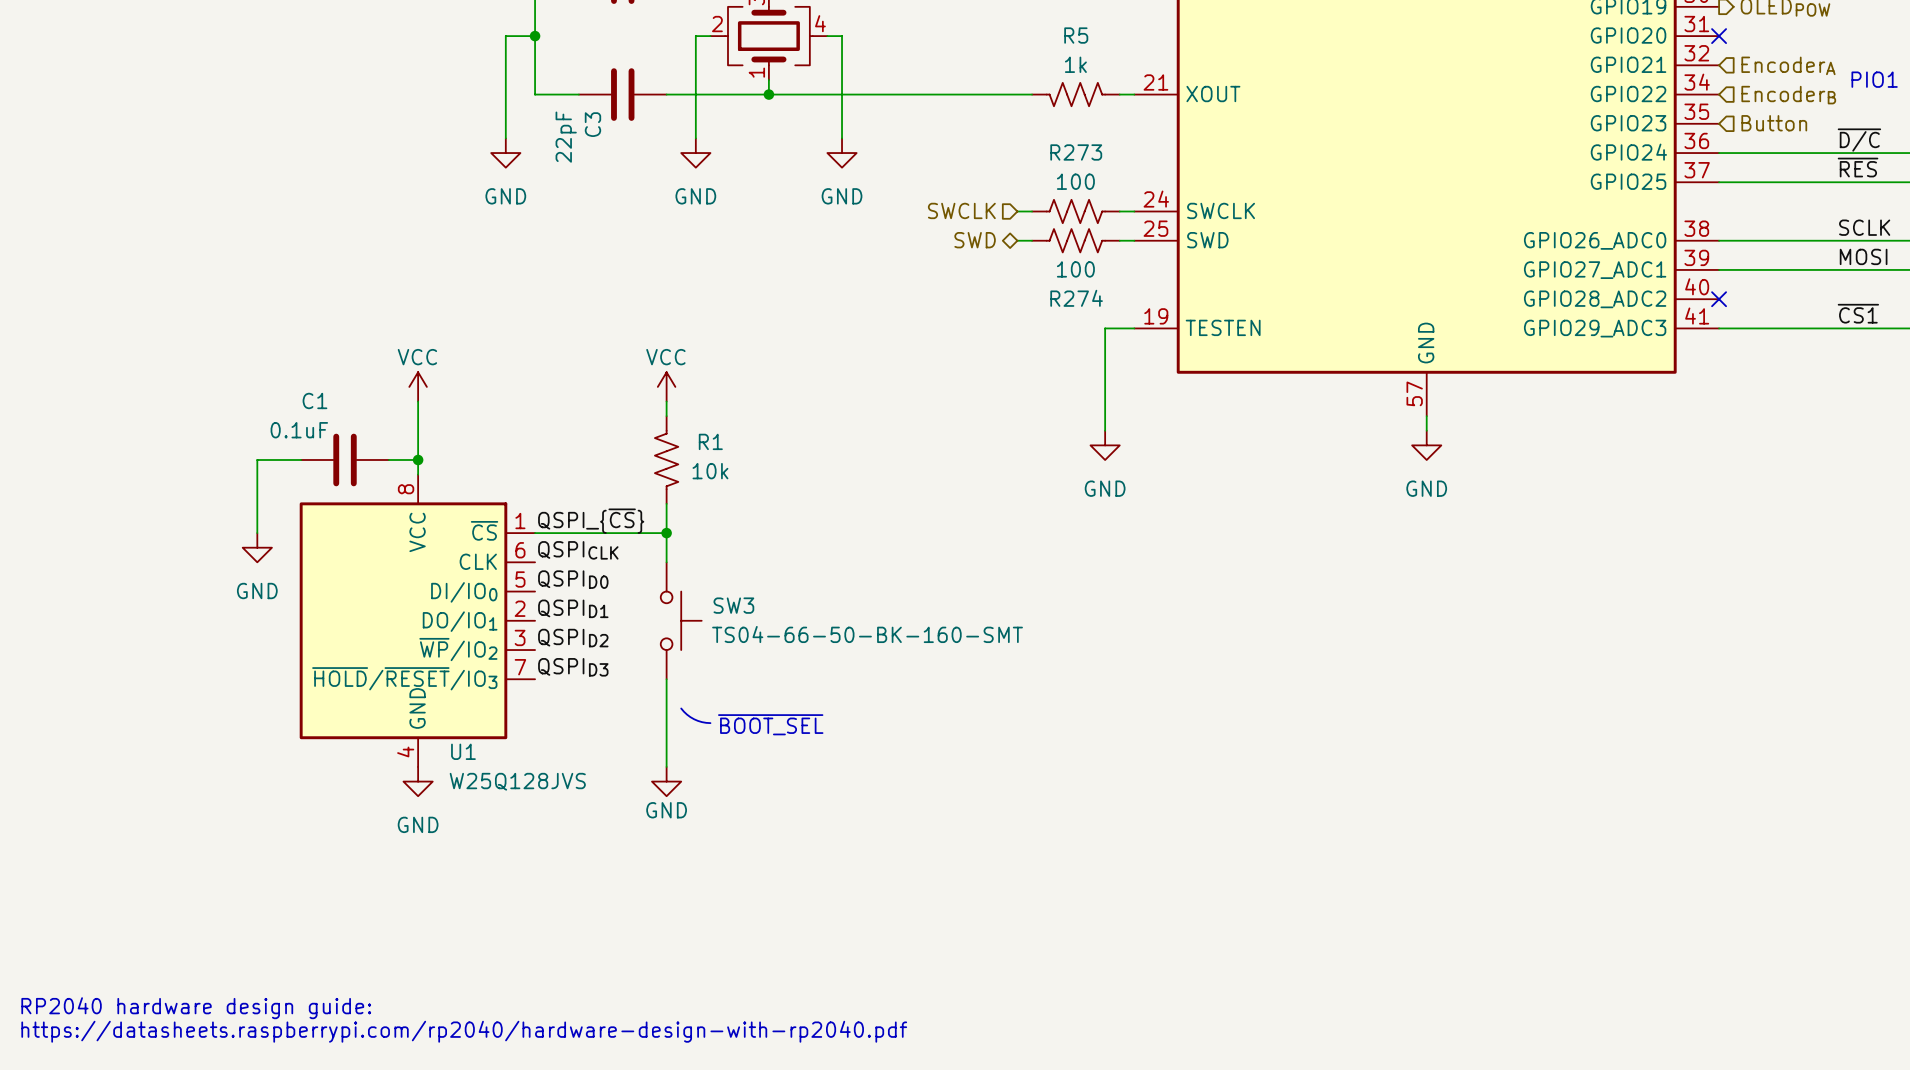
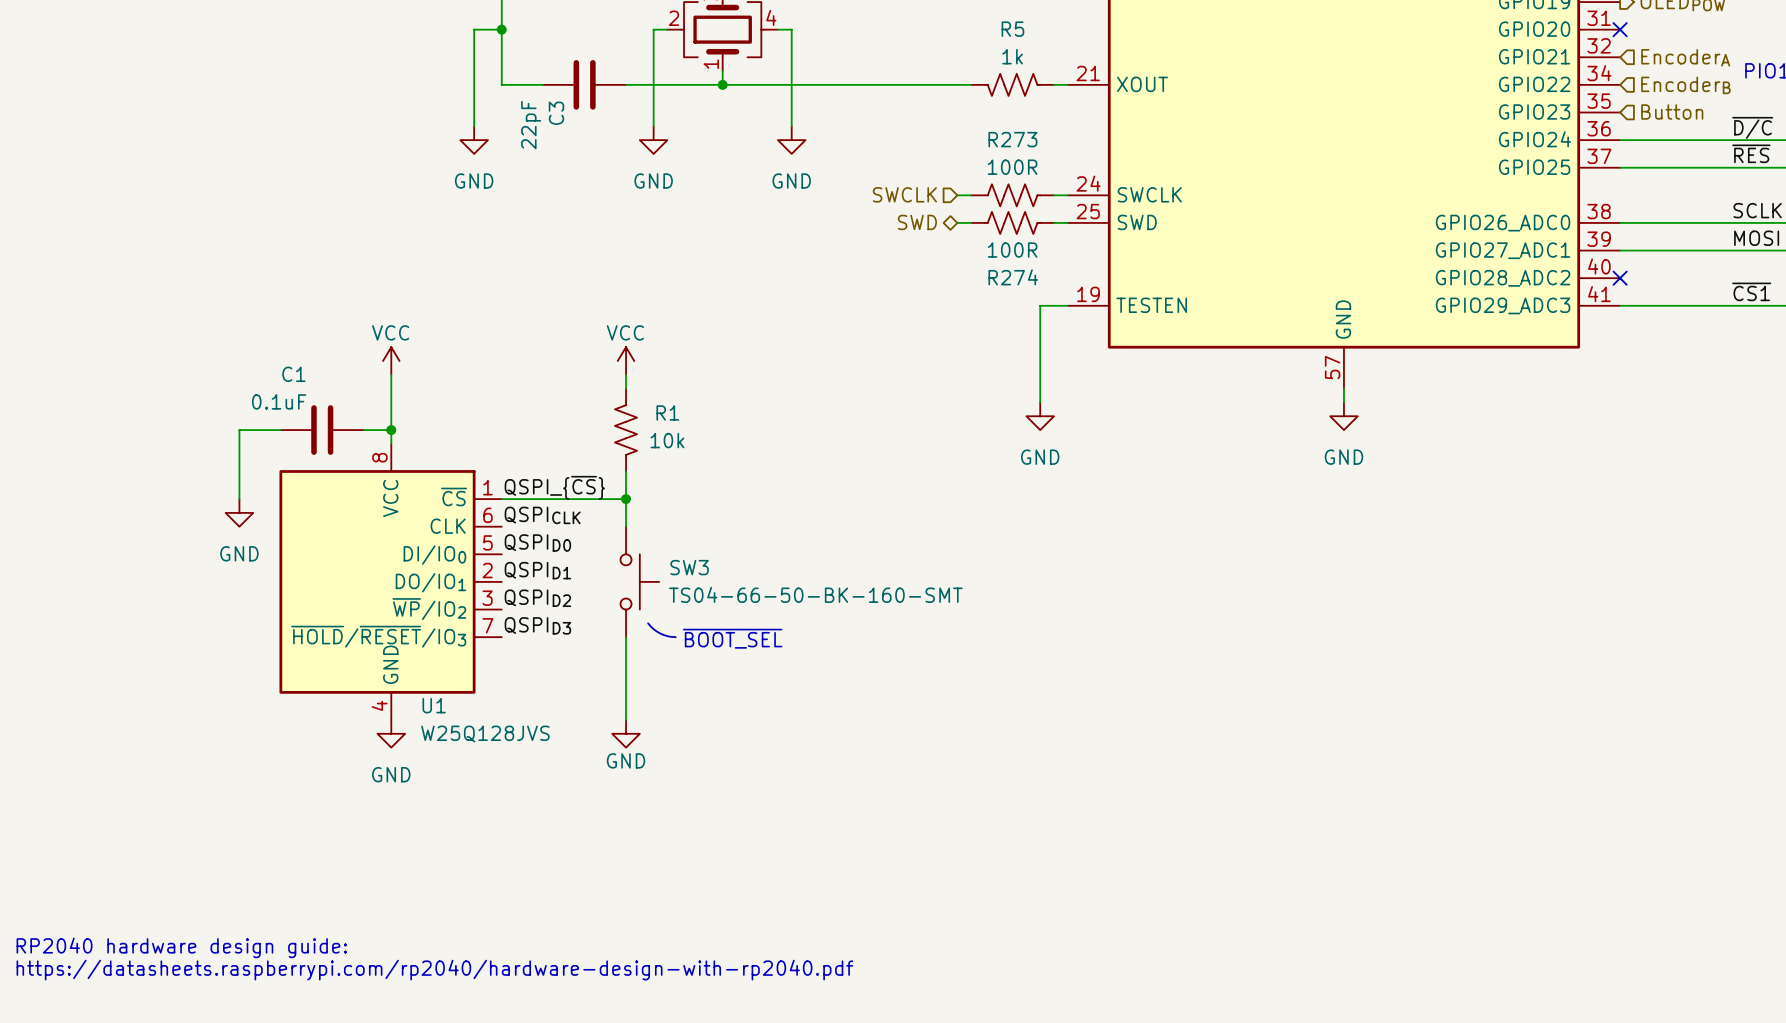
R273 value: 100 (1075, 181) -> 100R (1012, 167)
R274 value: 100 (1075, 269) -> 100R (1012, 250)
line: (681, 708) (694, 719) (710, 723) -> (648, 623) (660, 633) (675, 637)
text position: ~{BOOT_SEL} (770, 724) -> ~{BOOT_SEL} (732, 638)

